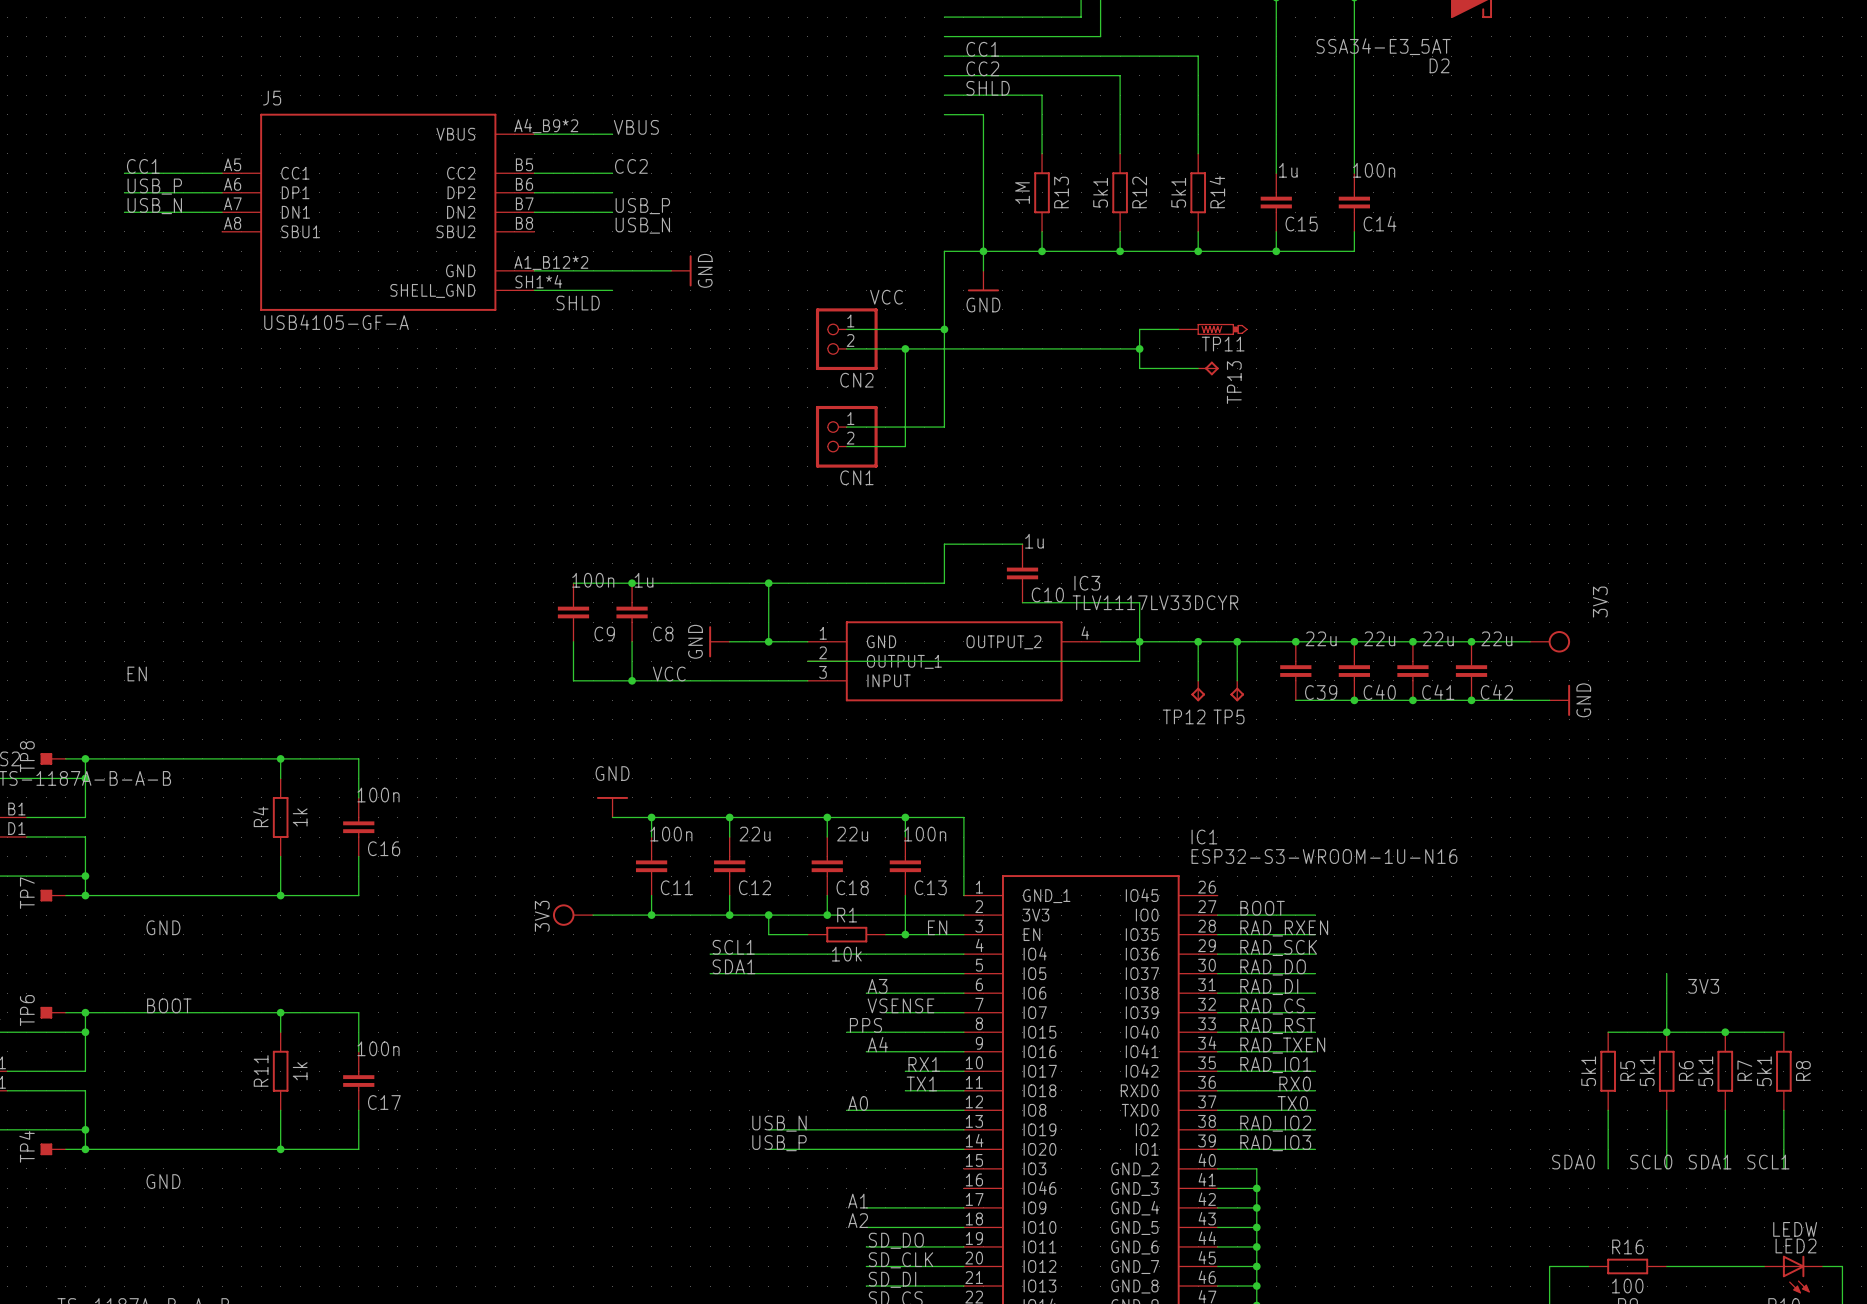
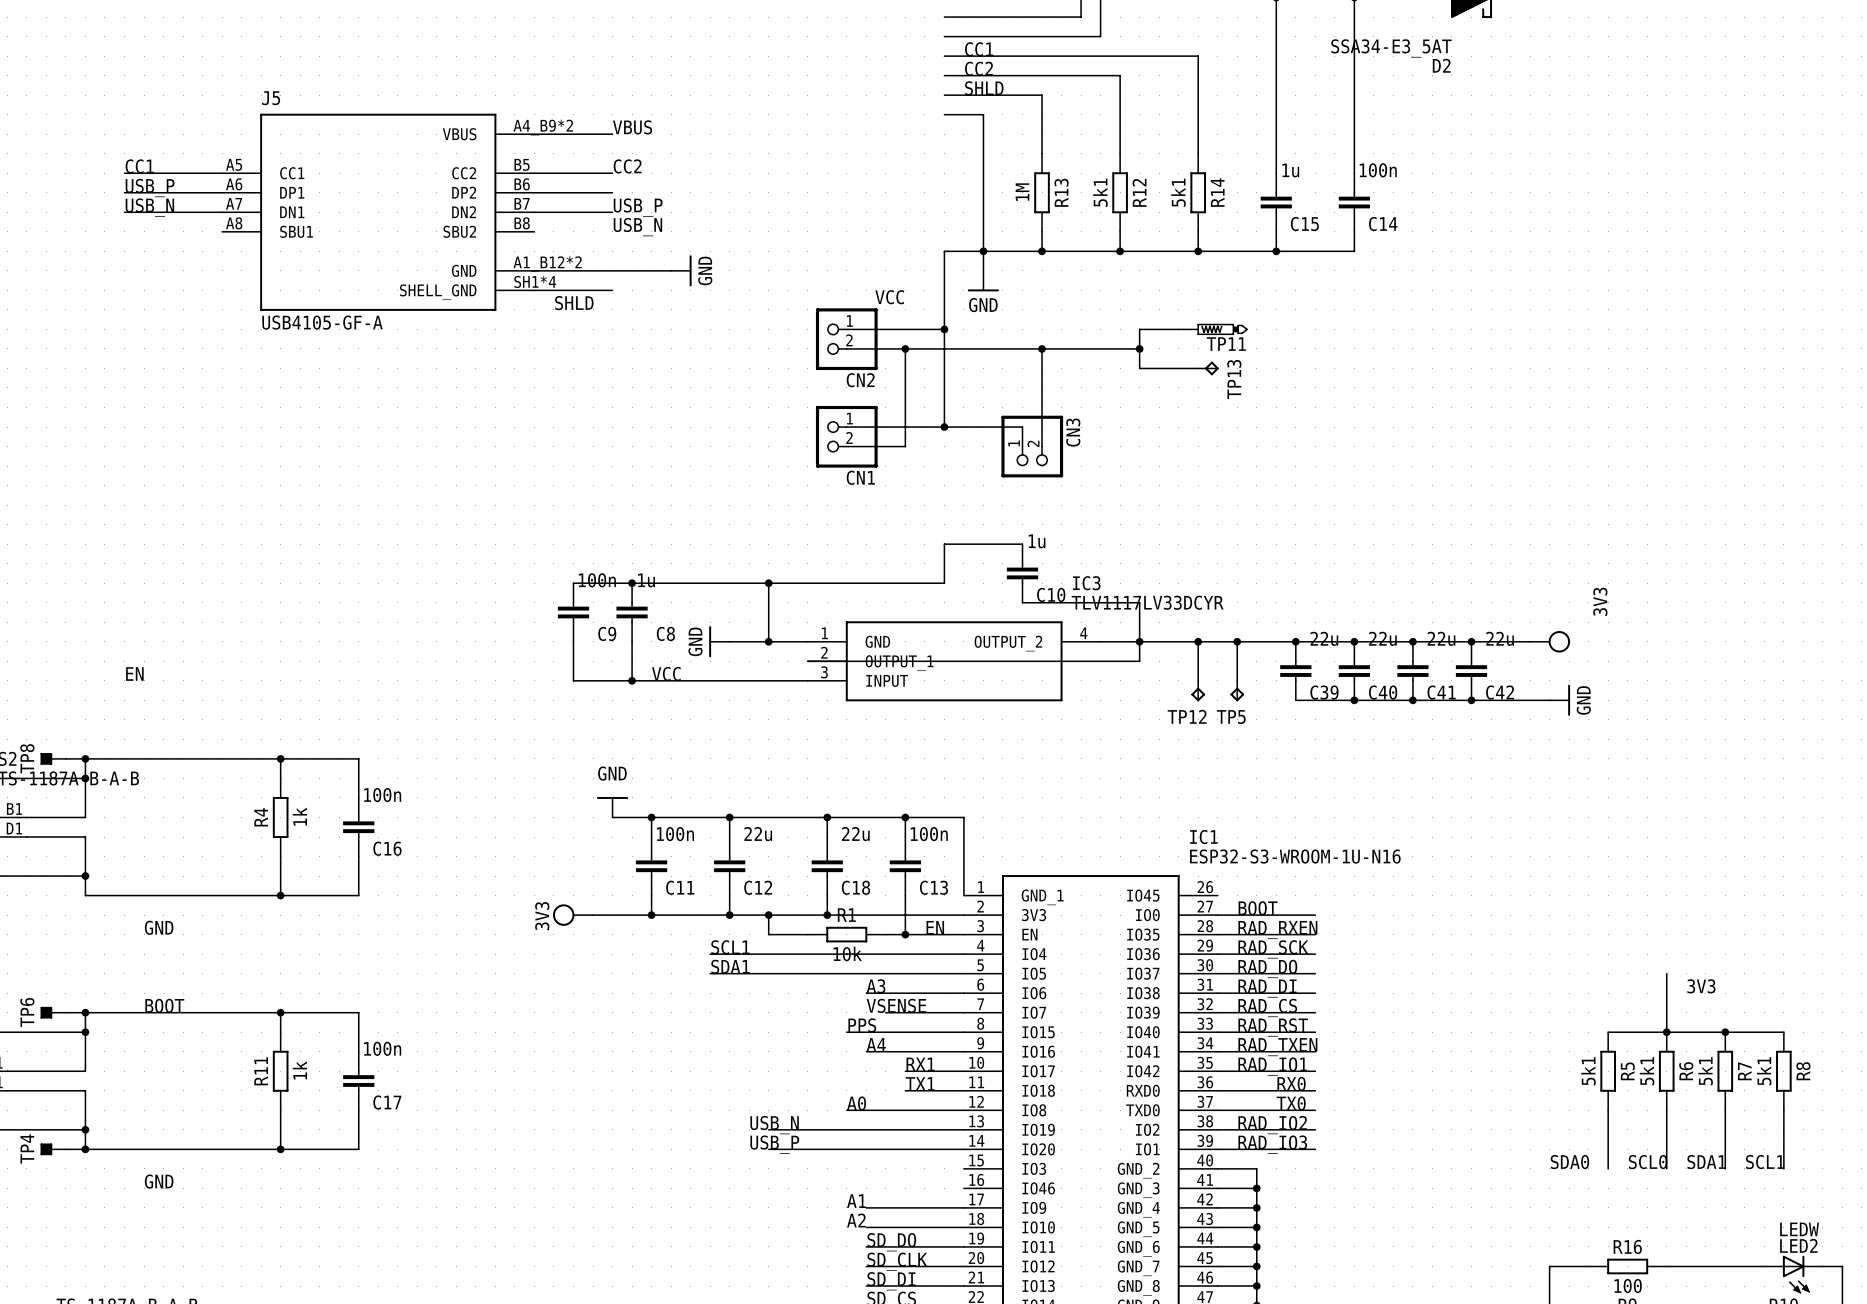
wire: none -> (1042, 348) (1042, 446)
junction: none -> (1042, 348)
wire: none -> (944, 427) (1022, 427) (1022, 446)
junction: none -> (944, 427)
CN3: none -> (1032, 446)
TP7: (53, 895) -> none
wire: (65, 895) (85, 895) -> none
junction: (85, 895) -> none

